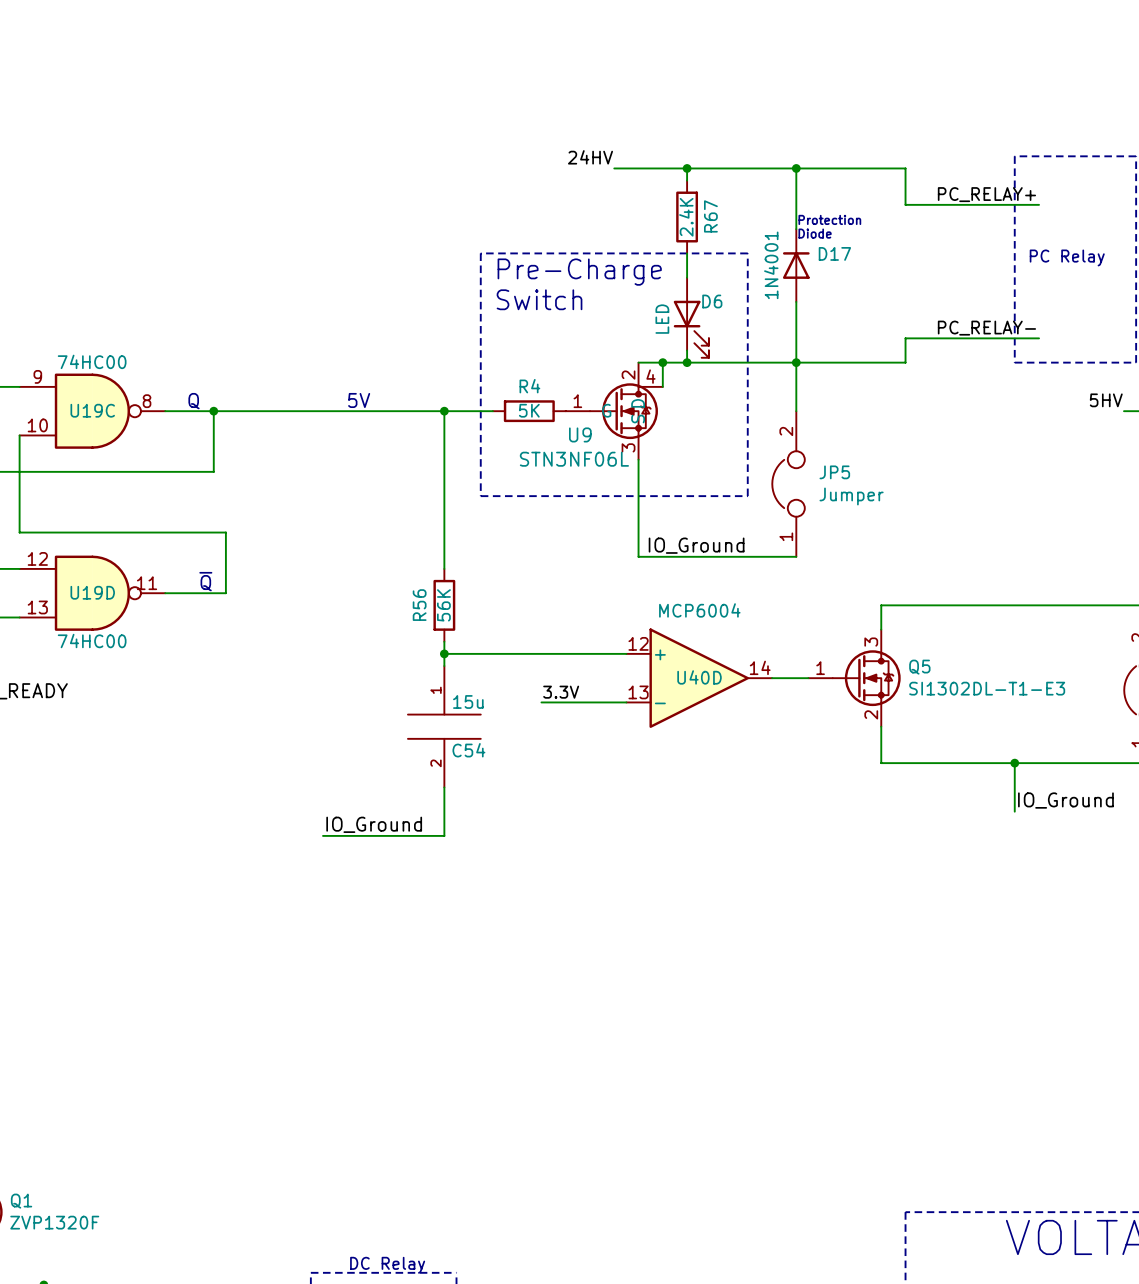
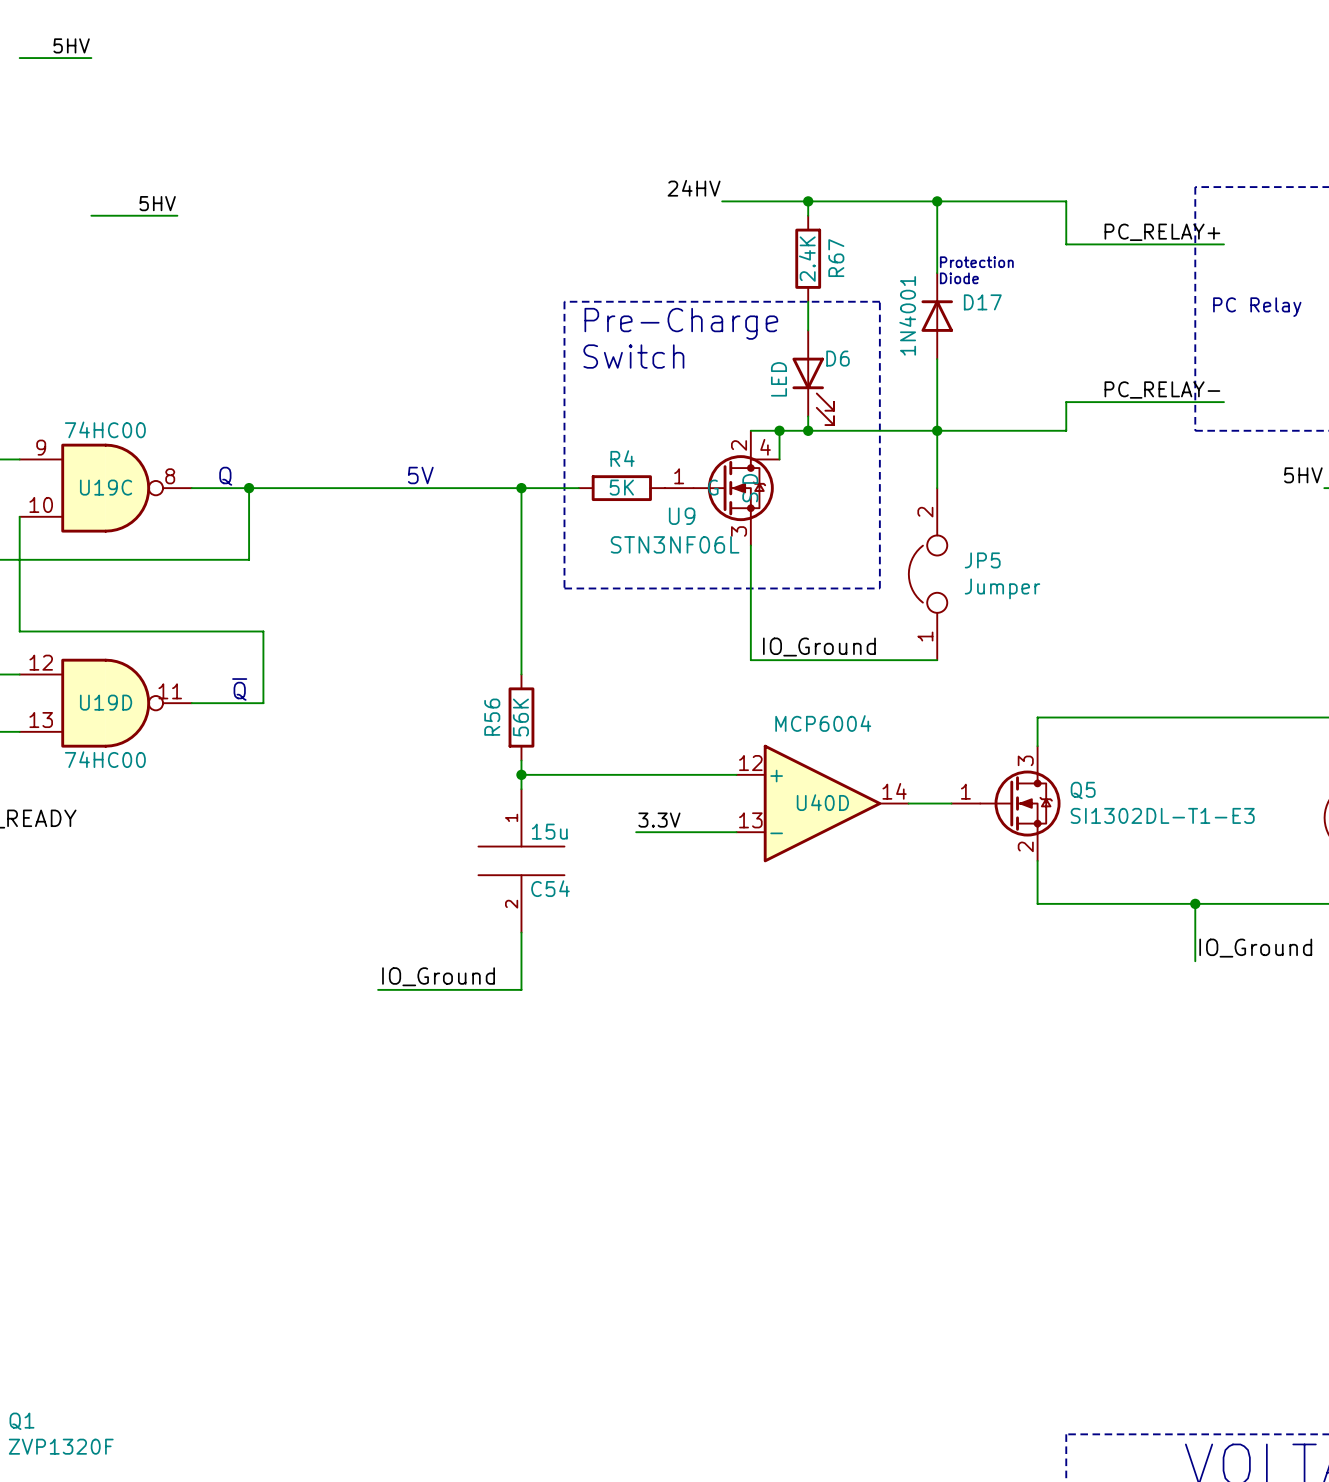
label: none -> 5HV (71, 45)
wire: none -> (19, 58) (91, 58)
label: none -> 5HV (157, 203)
wire: none -> (91, 215) (177, 215)

